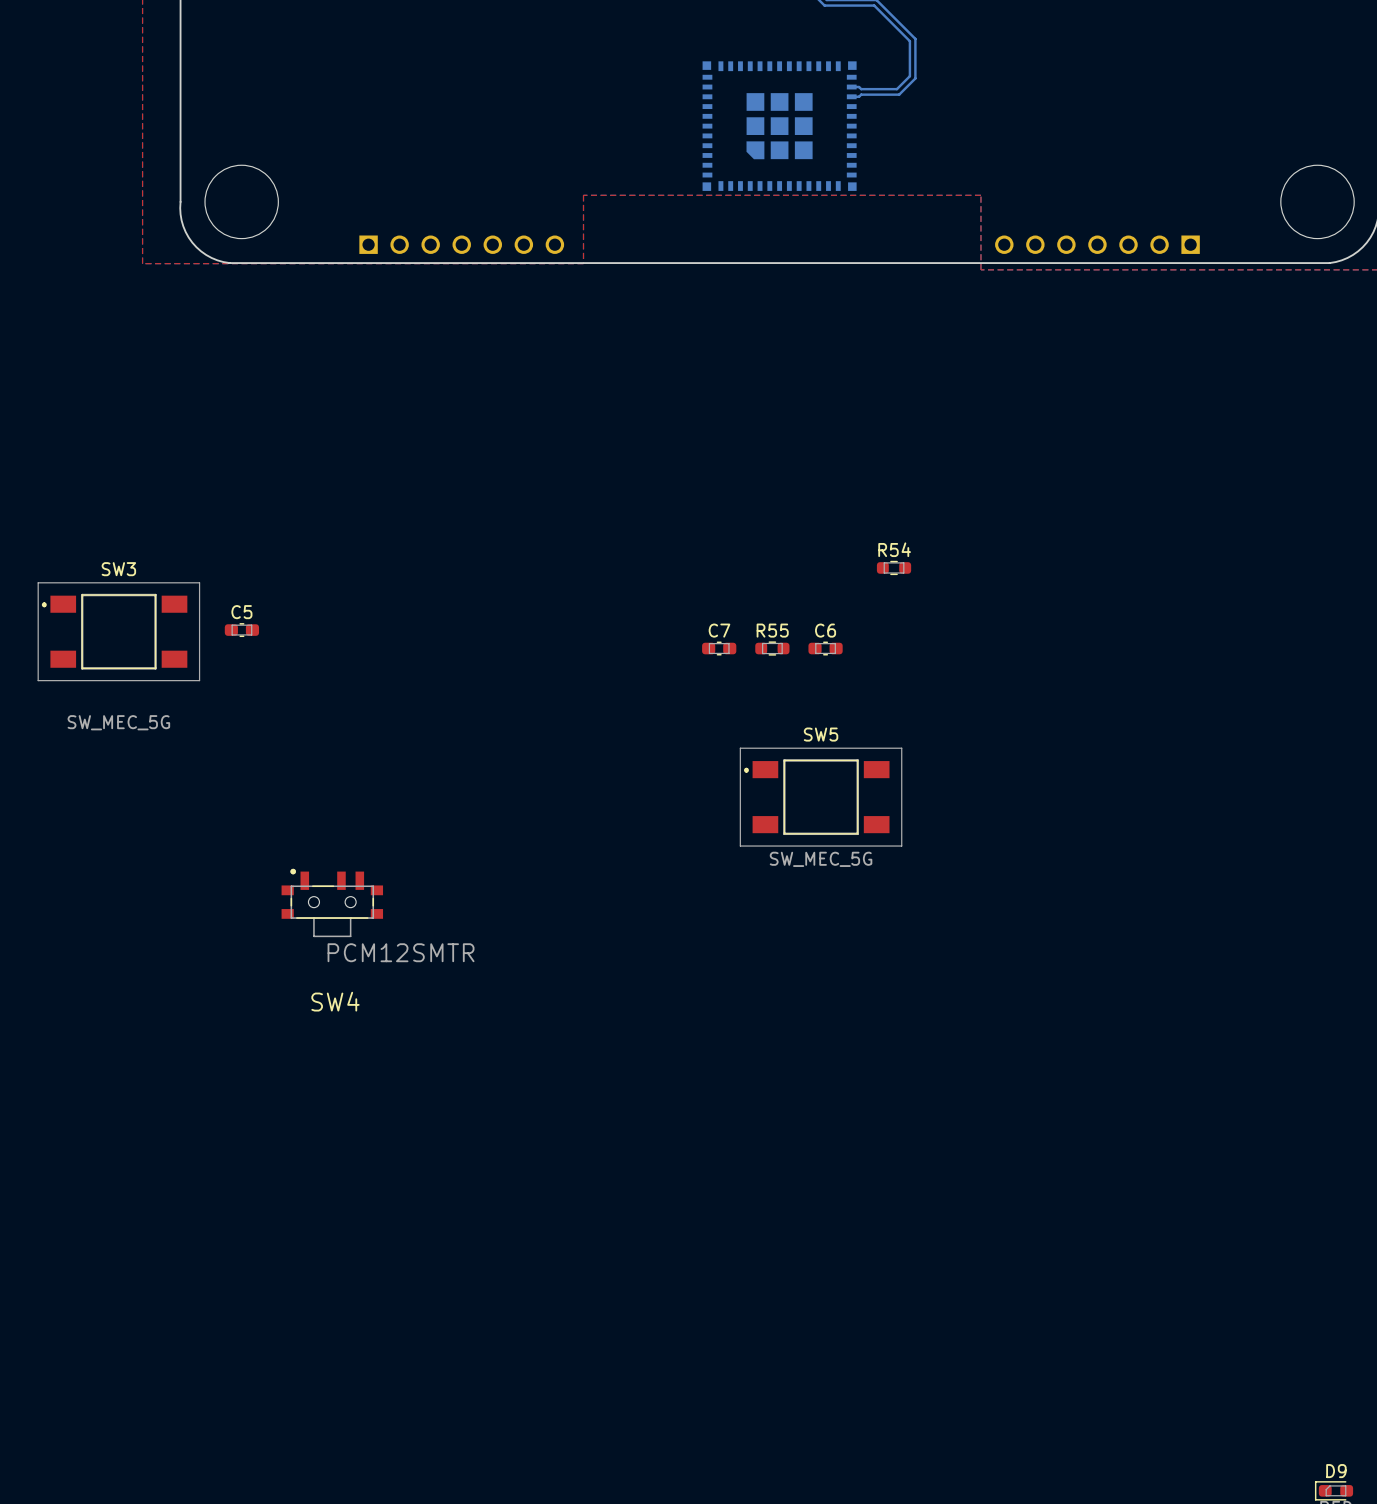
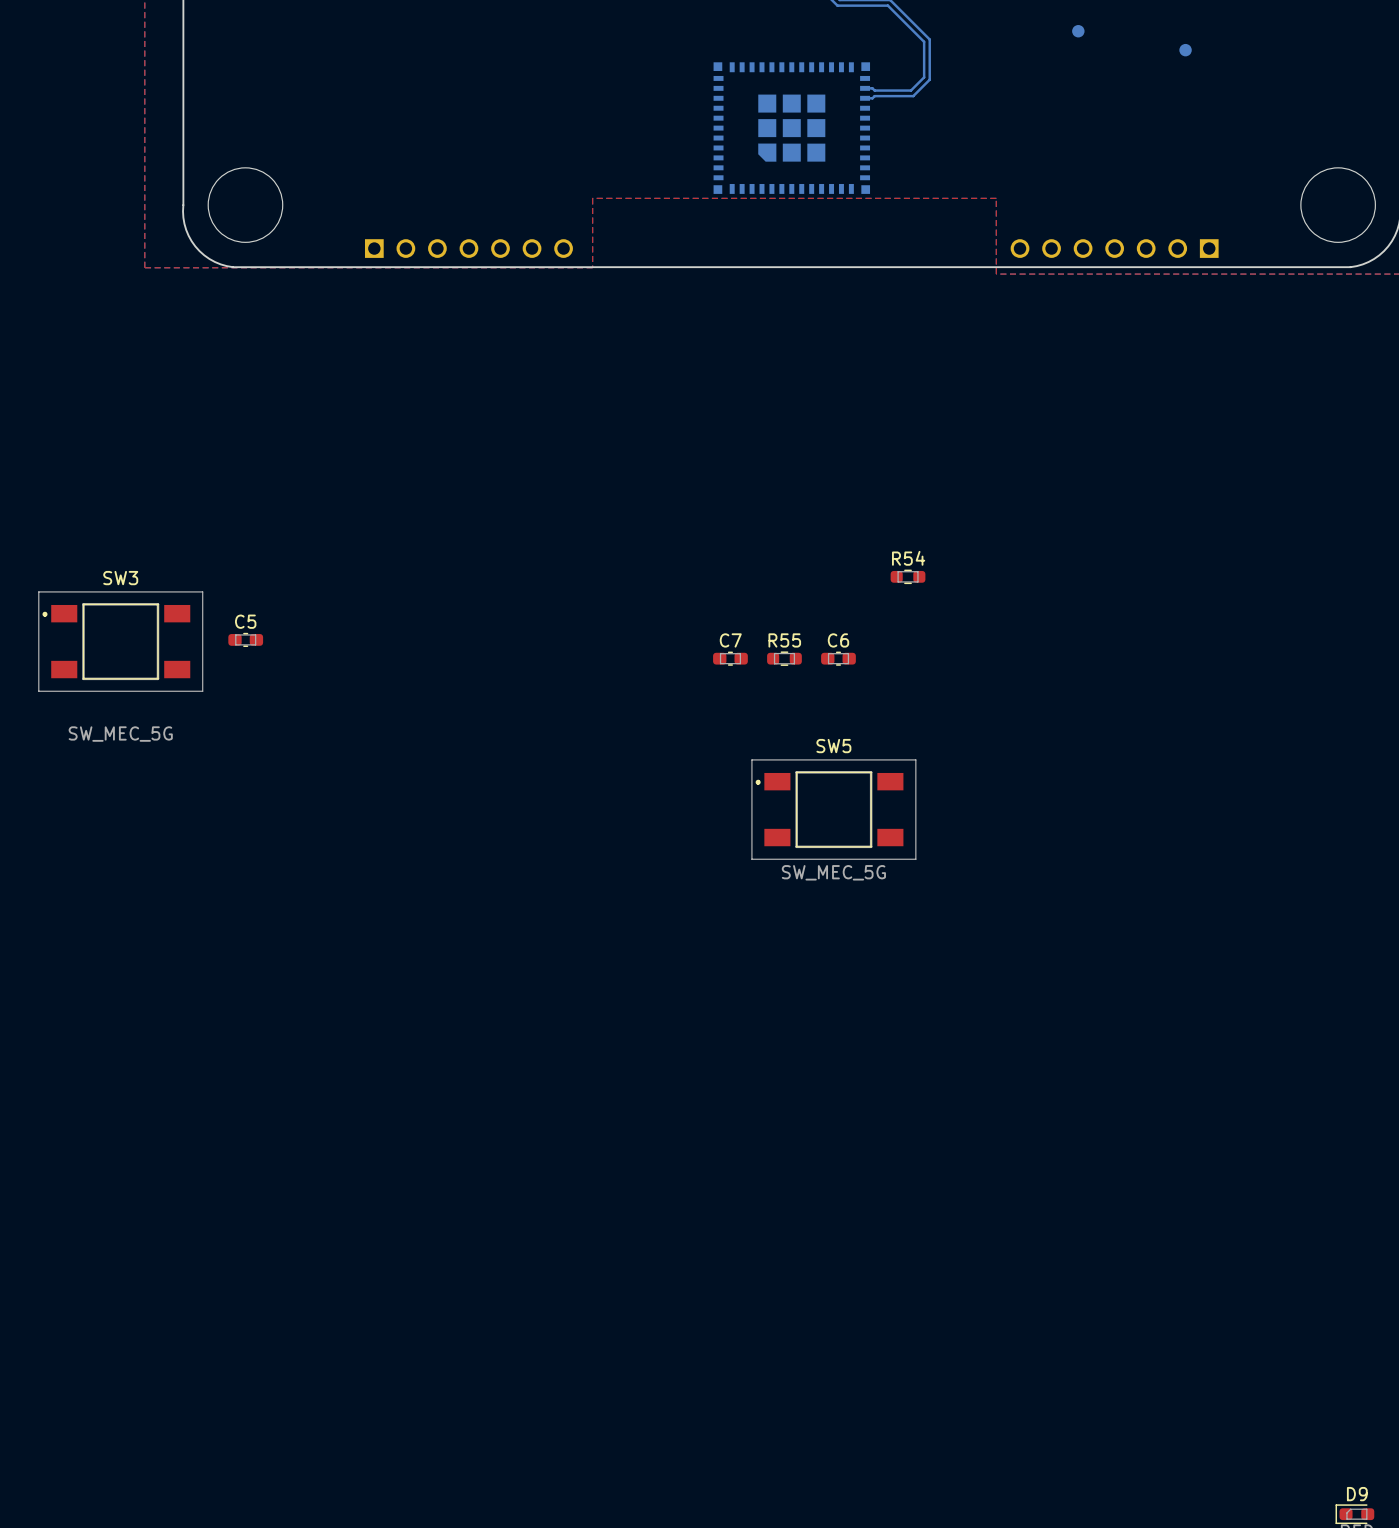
part: none -> (1078, 31)
part: none -> (1185, 50)
SW4: PCM12SMTR (332, 902) -> none

